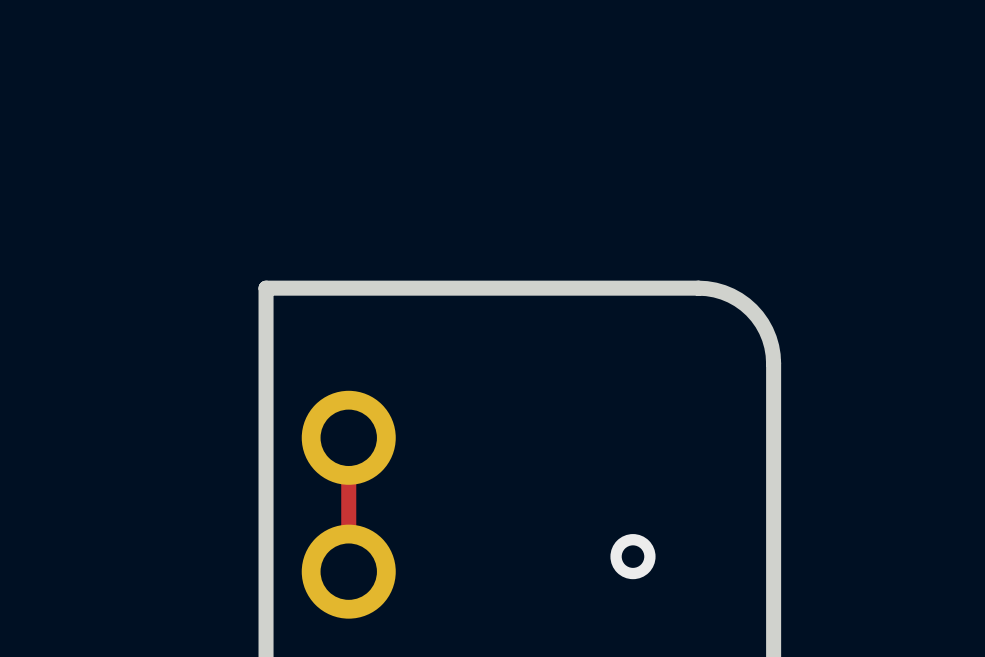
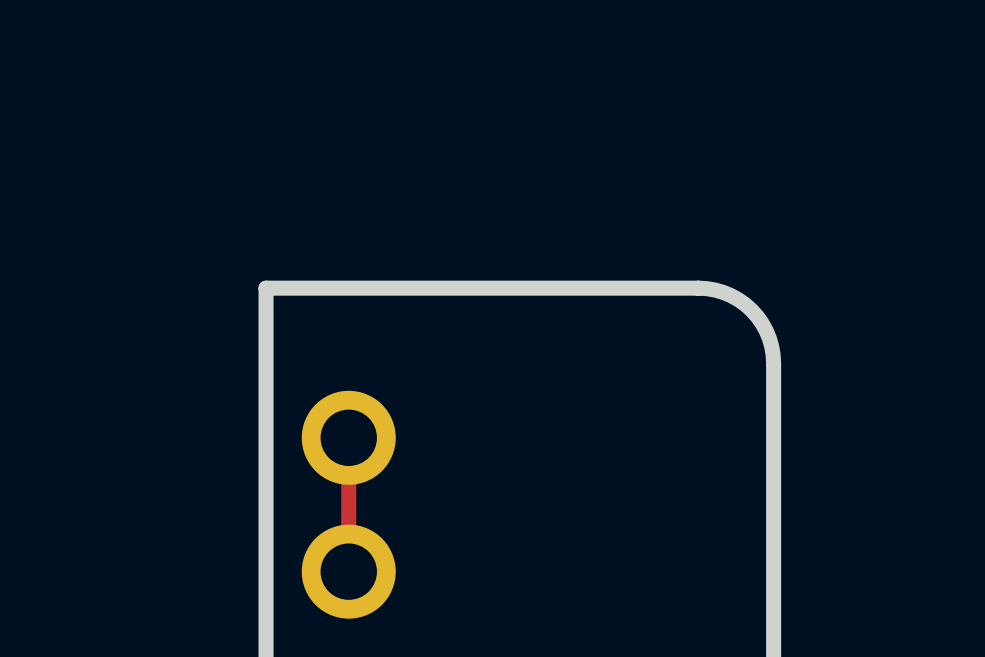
via: (632, 556) -> none

